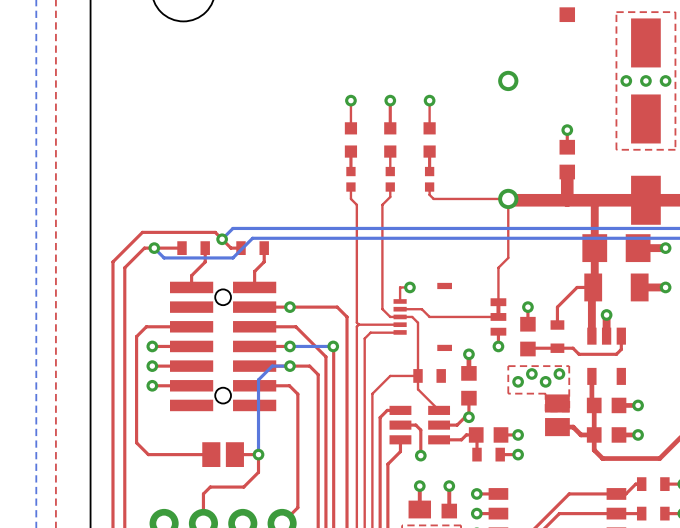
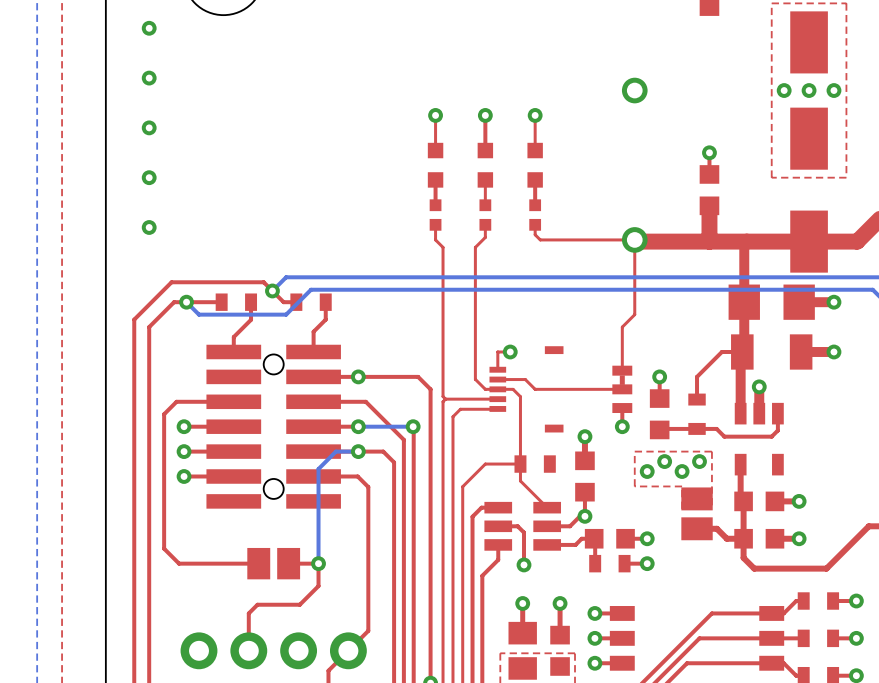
via: none -> (149, 28)
via: none -> (149, 78)
via: none -> (149, 127)
via: none -> (149, 177)
via: none -> (149, 227)

